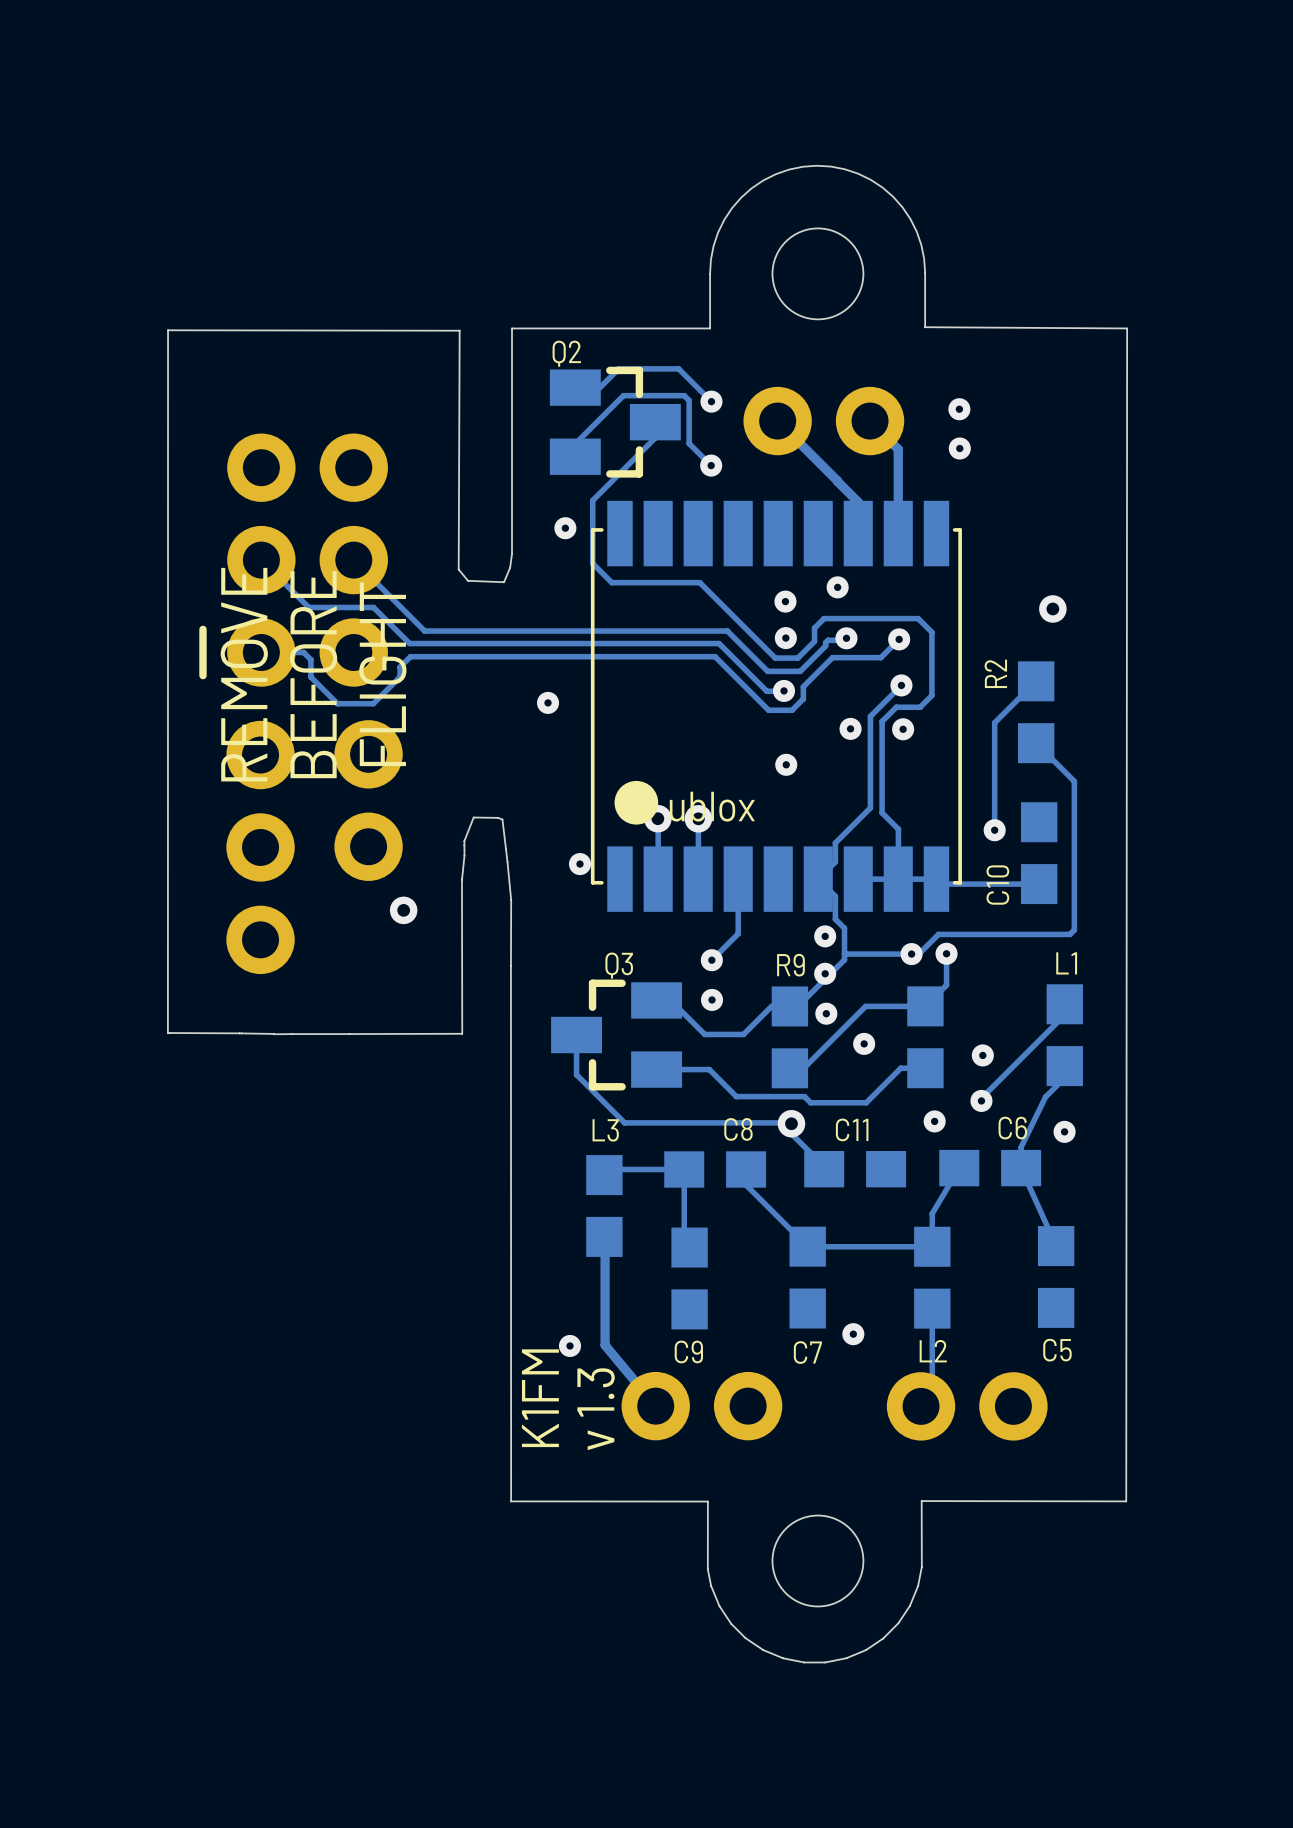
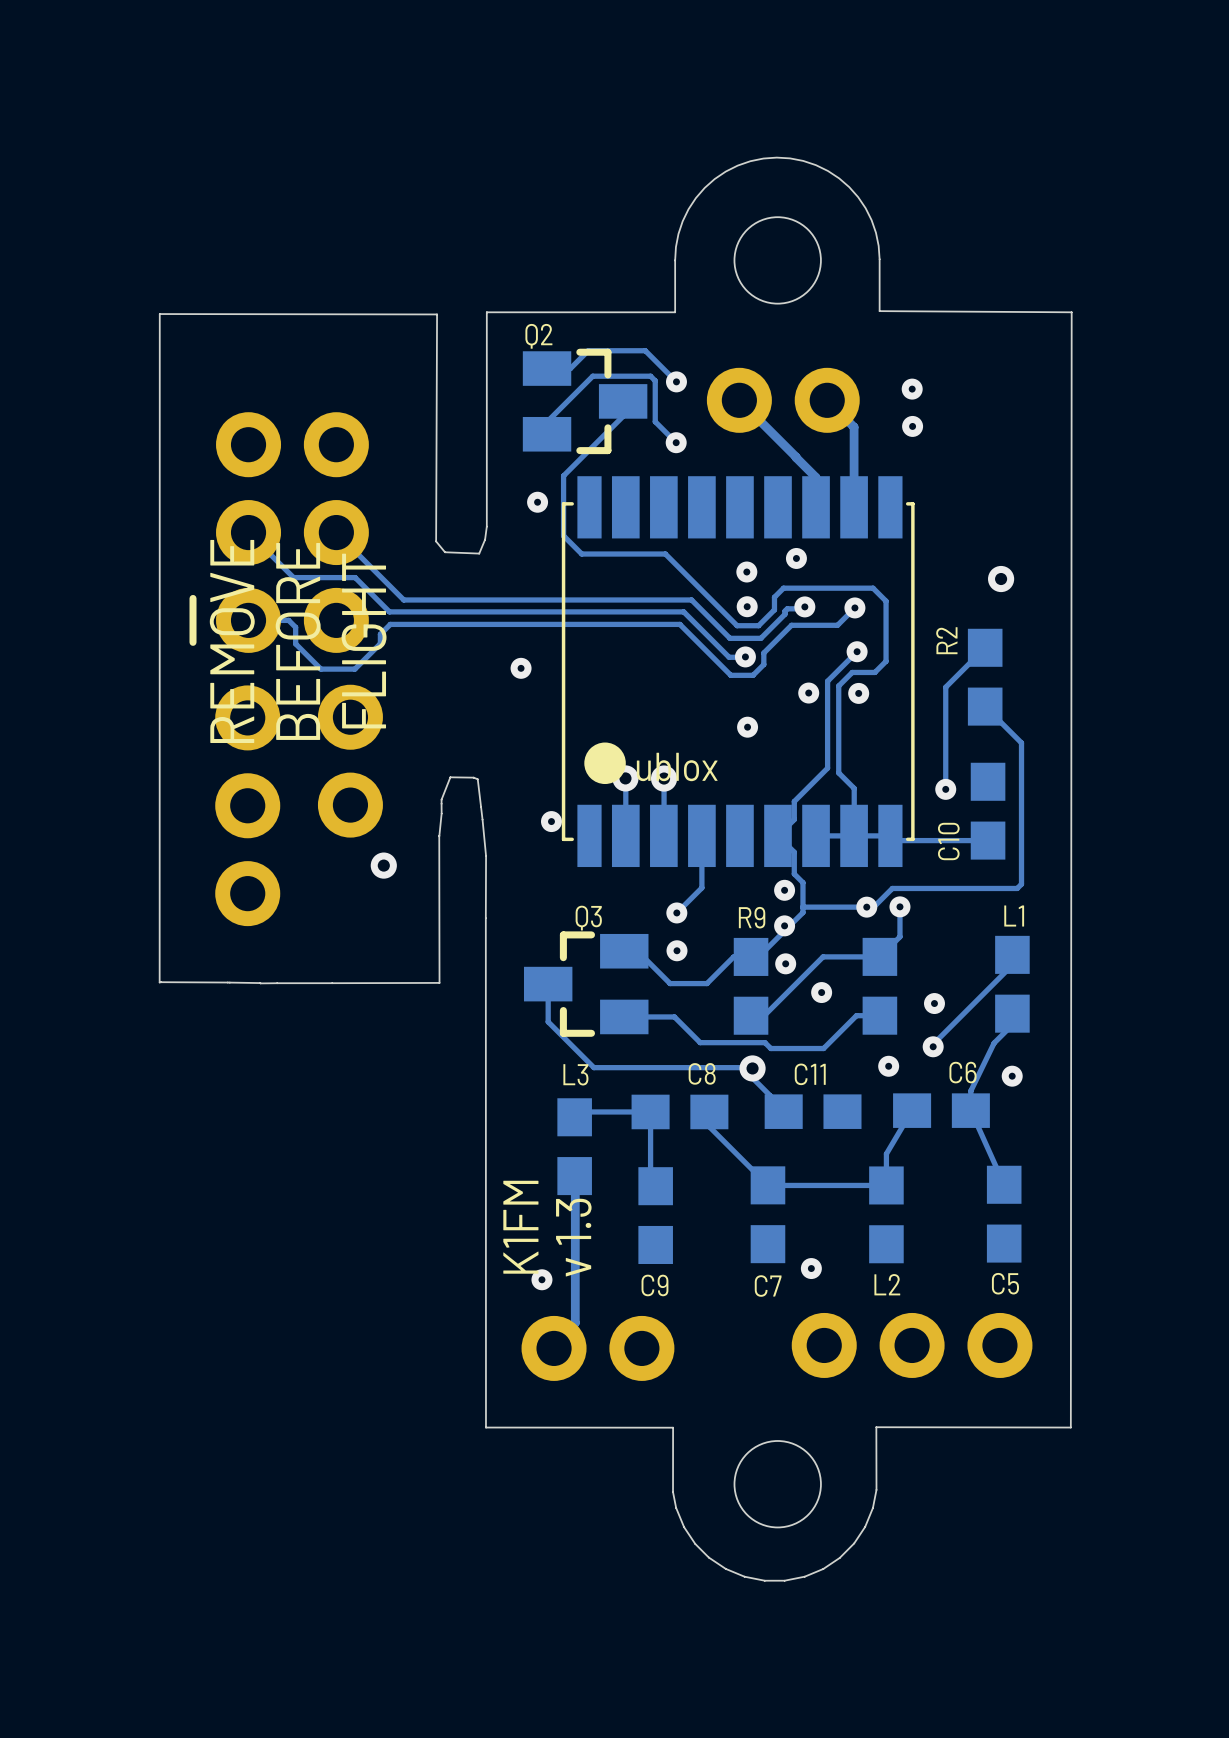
track: (932, 1308) (932, 1395) (921, 1406) -> none
track: (605, 1345) (655, 1406) -> (575, 1279) (575, 1322) (554, 1348)
part footprint: [886, 1372, 1048, 1441] -> [791, 1312, 1033, 1378]
text position: K1FM (540, 1398) -> K1FM (520, 1227)
part position: (701, 1406) -> (597, 1348)
text position: v 1.3 (596, 1409) -> v 1.3 (573, 1237)

